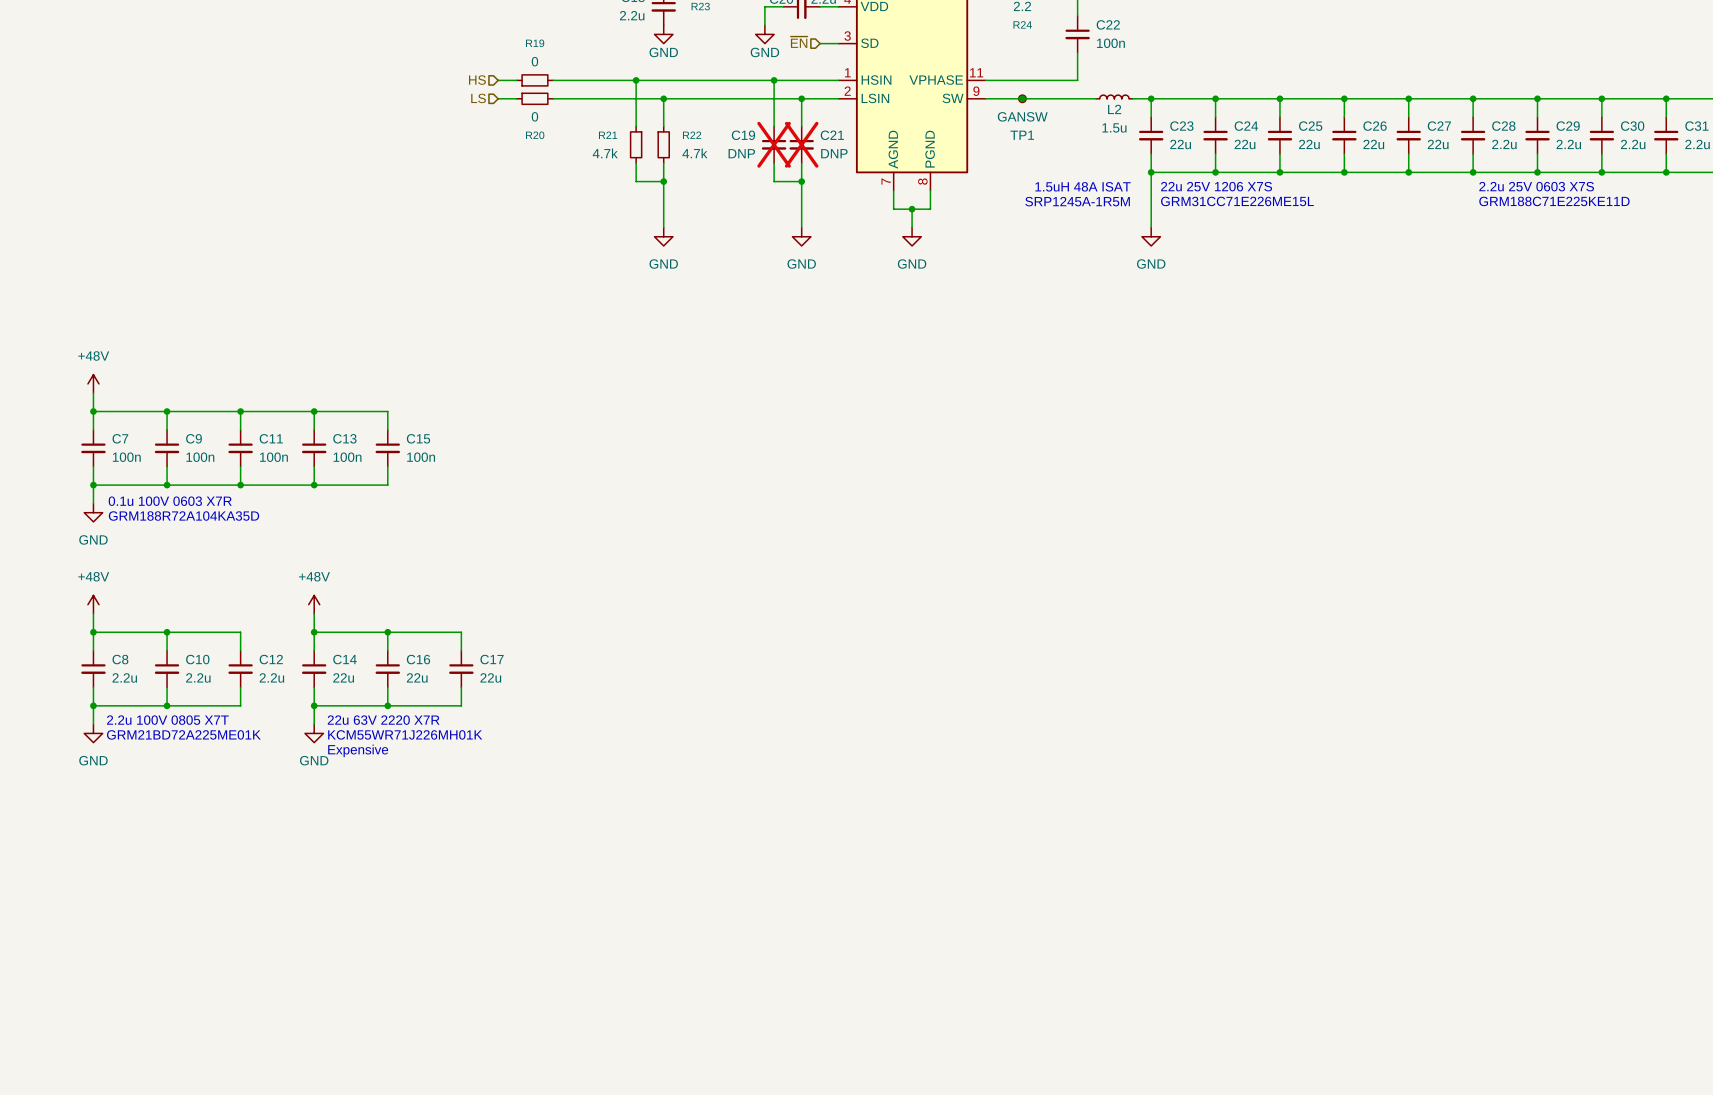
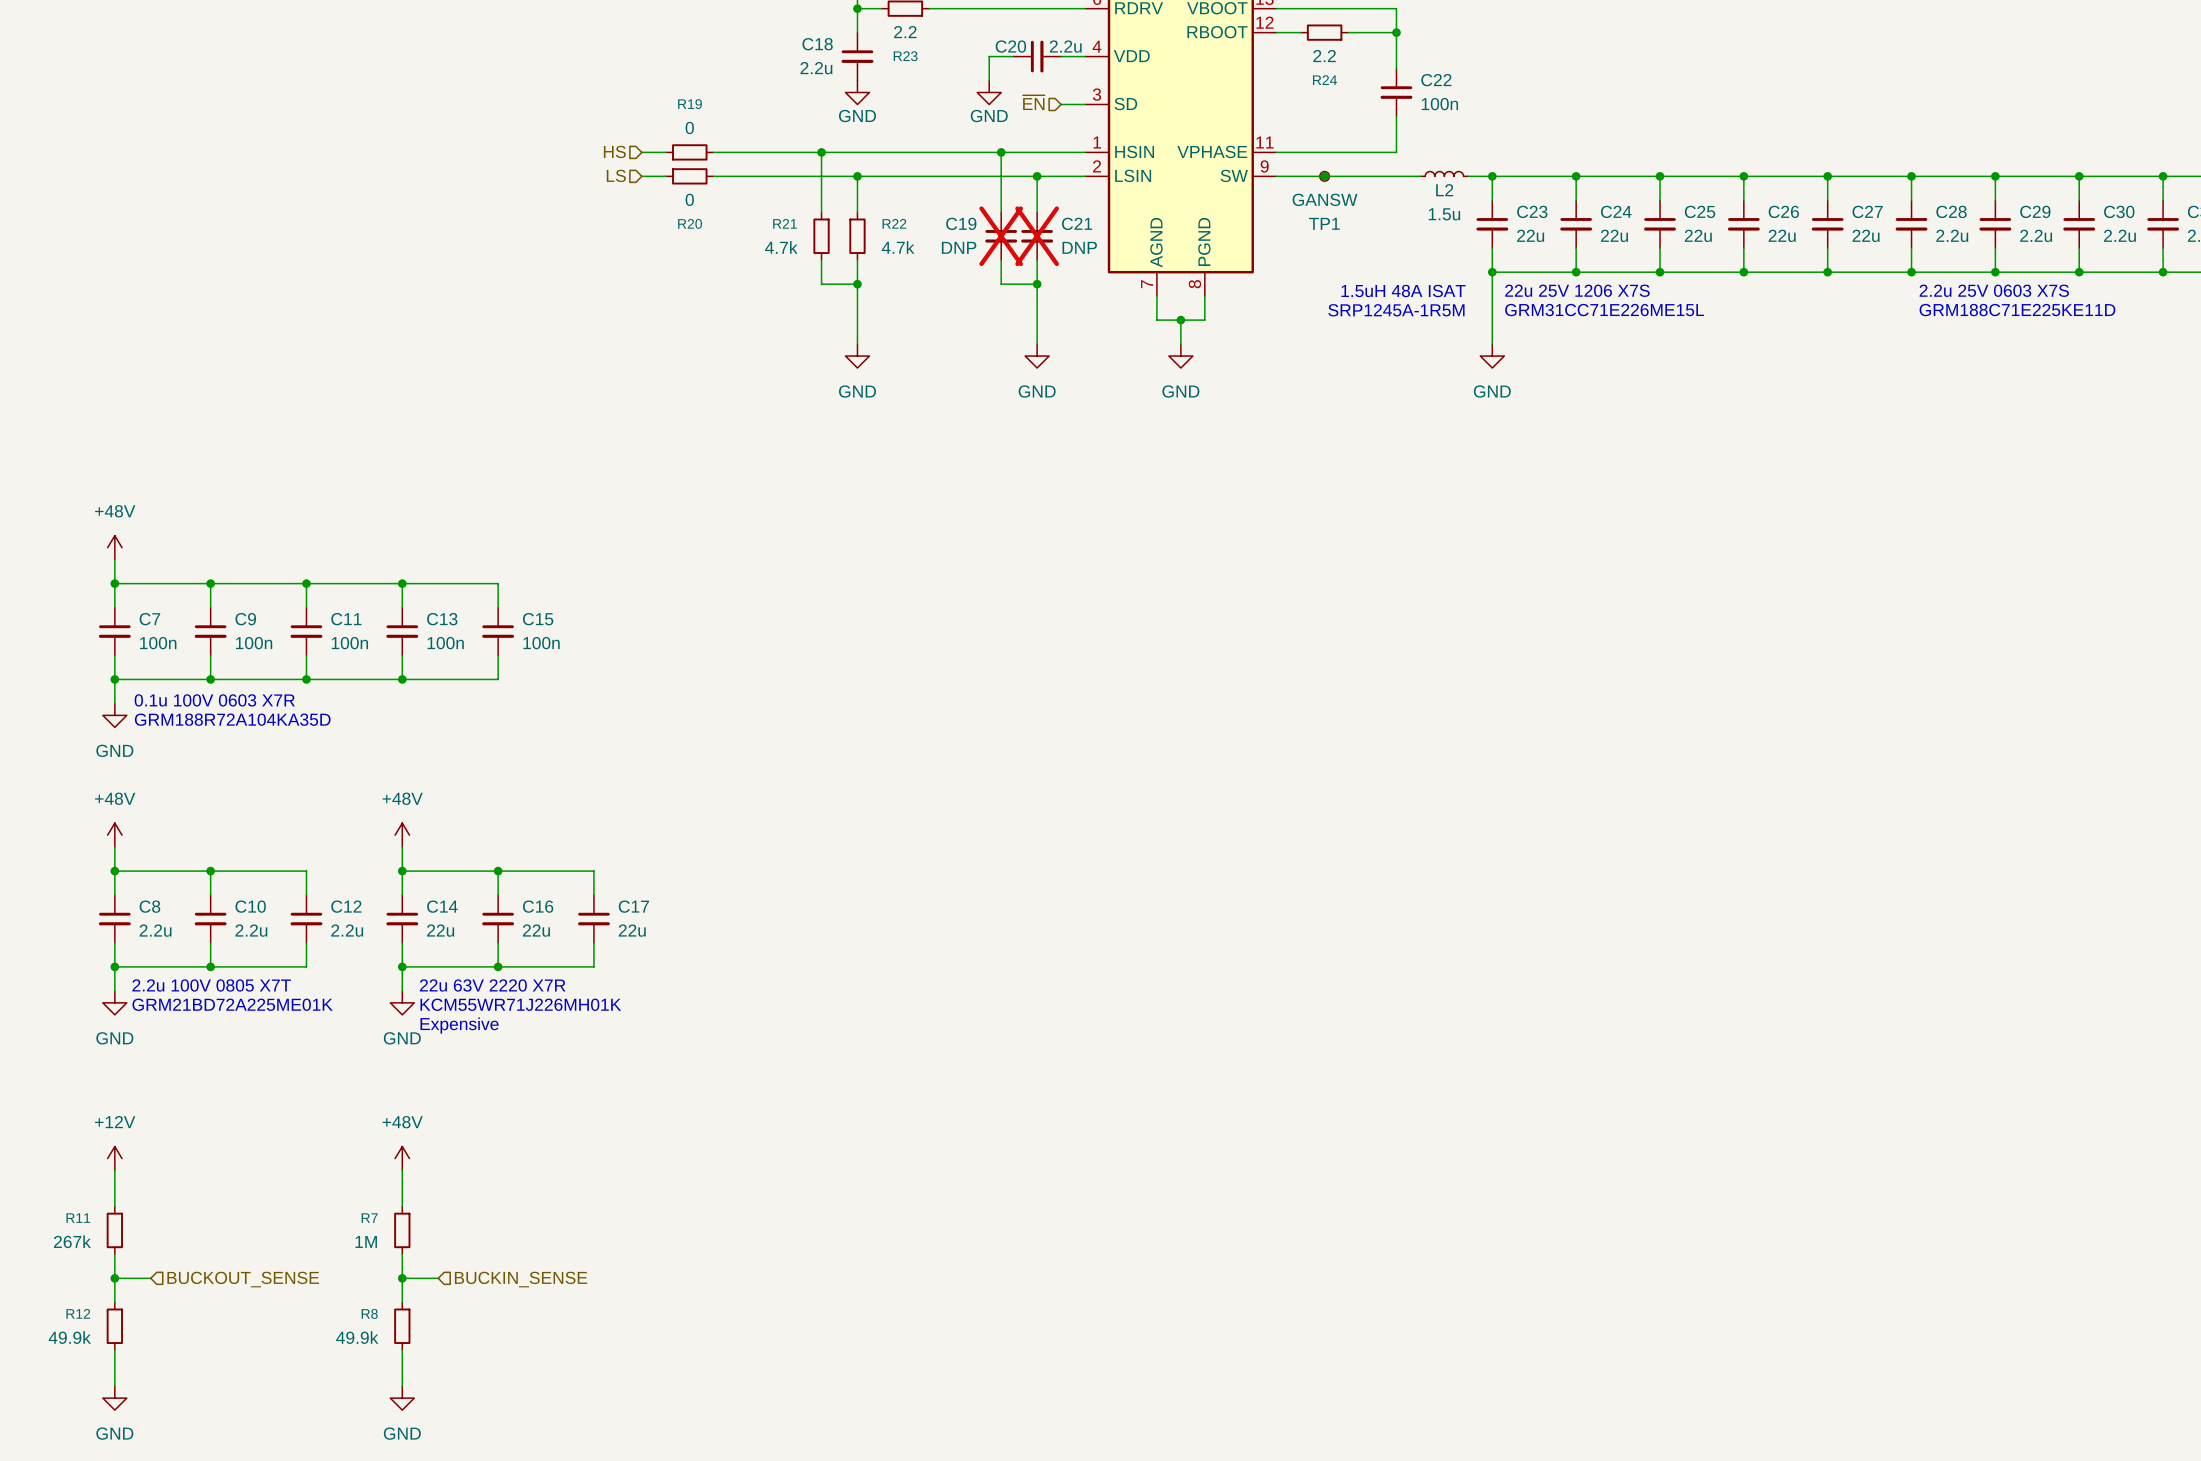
power symbol: none -> +12V (114, 1158)
power symbol: none -> +48V (402, 1158)
wire: none -> (114, 1170) (114, 1206)
wire: none -> (402, 1170) (402, 1206)
R11: none -> 267k (114, 1230)
R7: none -> 1M (402, 1230)
wire: none -> (114, 1254) (114, 1302)
wire: none -> (402, 1254) (402, 1302)
wire: none -> (114, 1278) (150, 1278)
junction: none -> (114, 1278)
wire: none -> (402, 1278) (438, 1278)
junction: none -> (402, 1278)
hierarchical label: none -> BUCKOUT_SENSE (243, 1279)
hierarchical label: none -> BUCKIN_SENSE (521, 1279)
R12: none -> 49.9k (114, 1326)
R8: none -> 49.9k (402, 1326)
wire: none -> (114, 1350) (114, 1386)
wire: none -> (402, 1350) (402, 1386)
power symbol: none -> GND (114, 1398)
power symbol: none -> GND (402, 1398)

